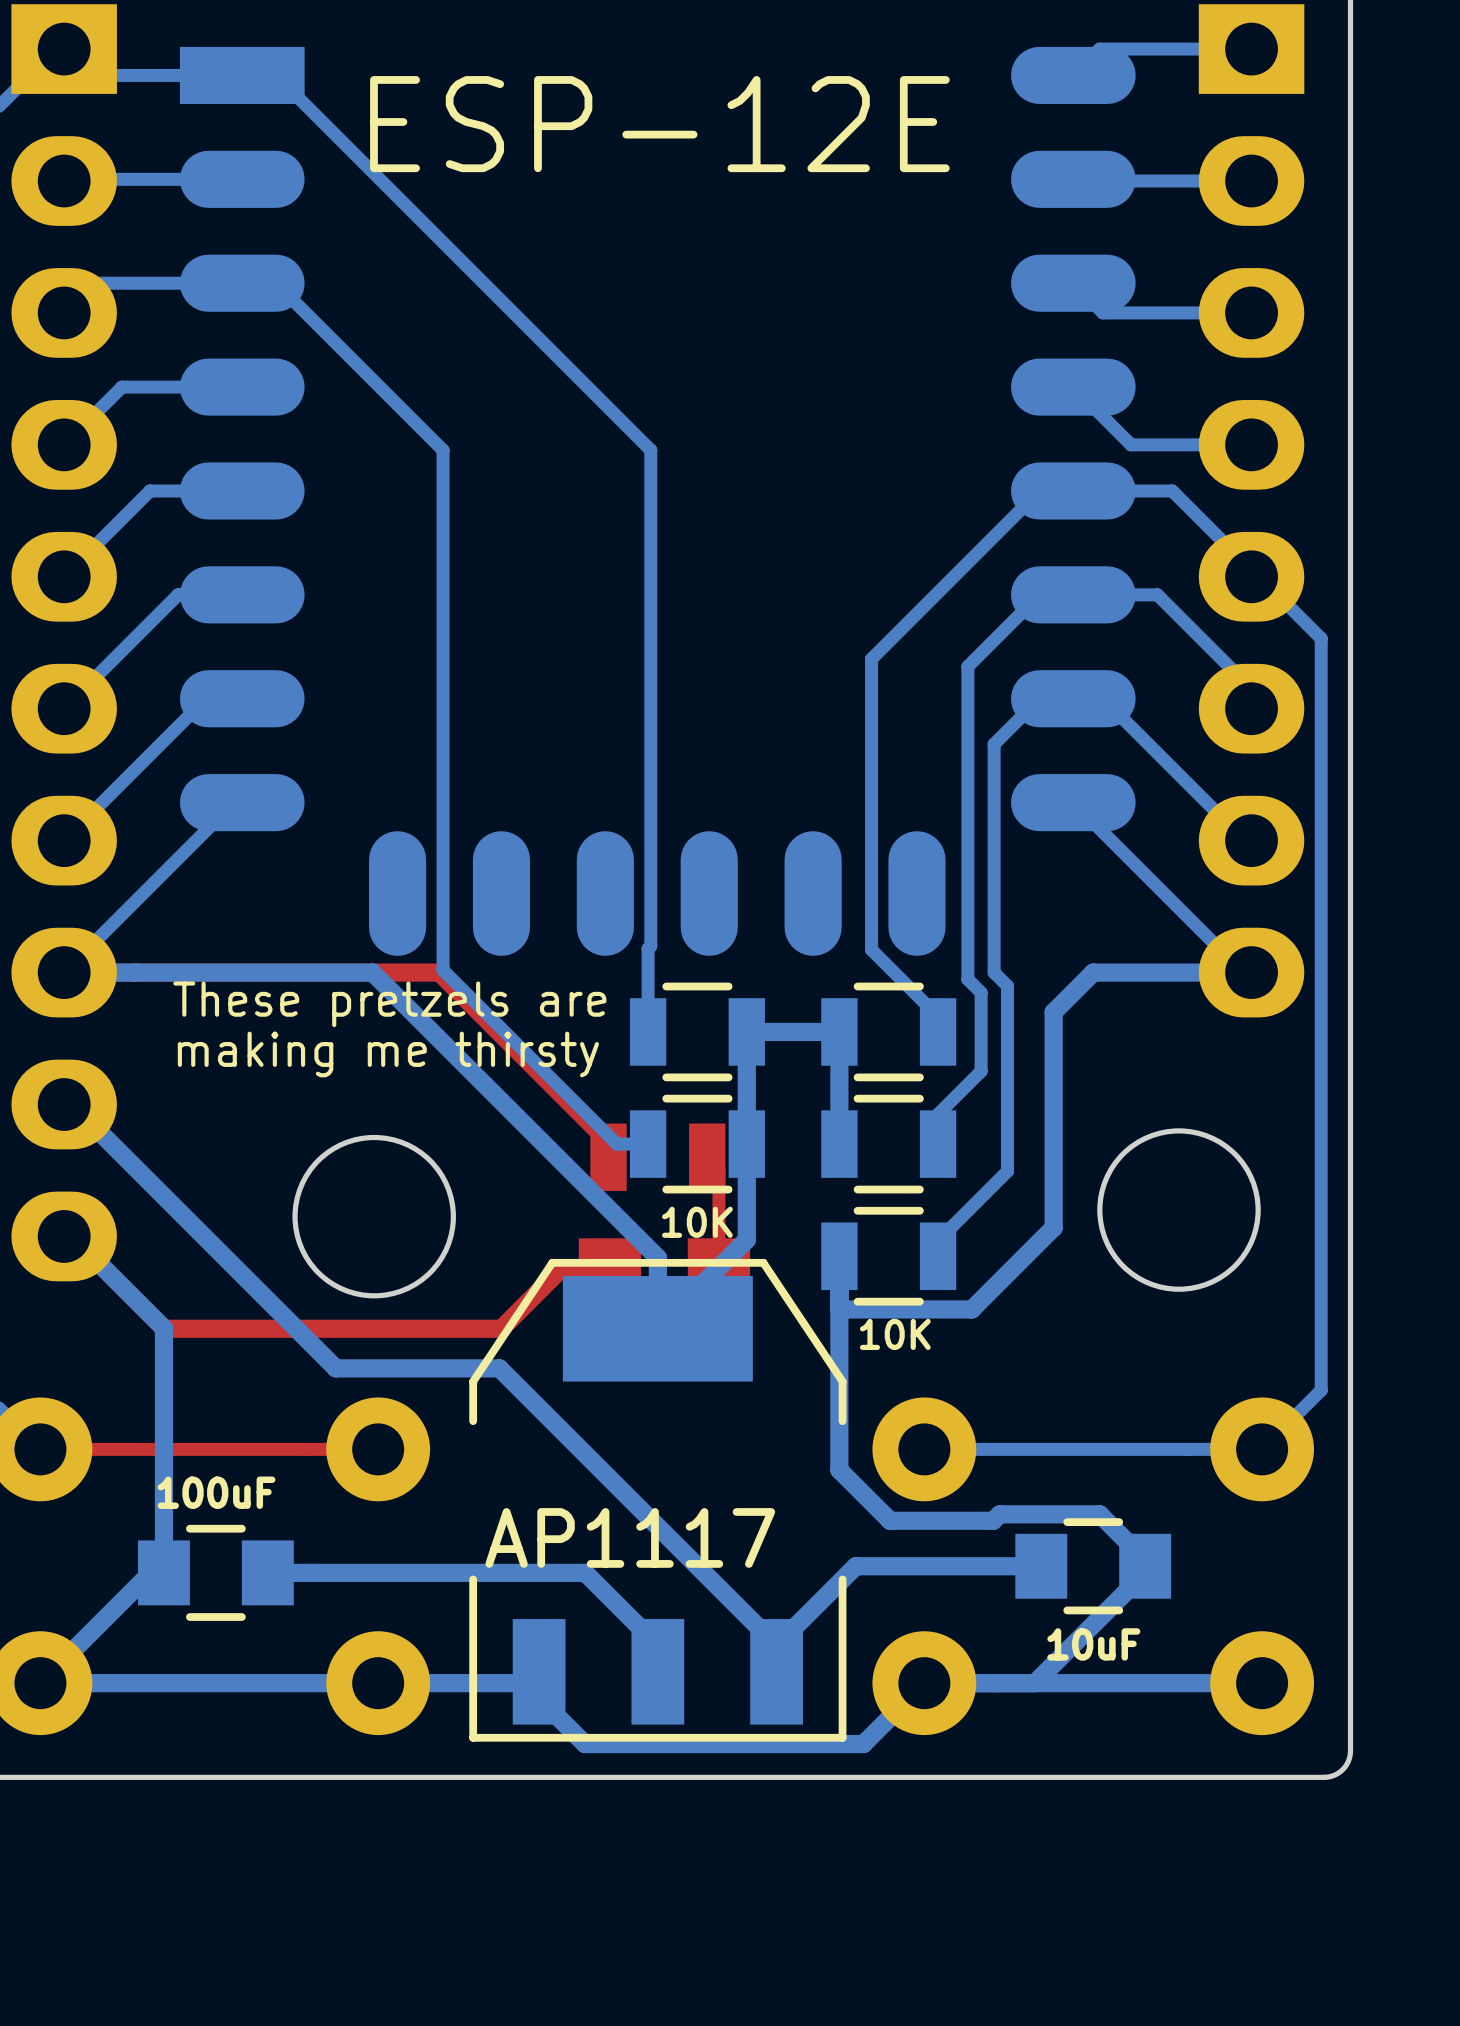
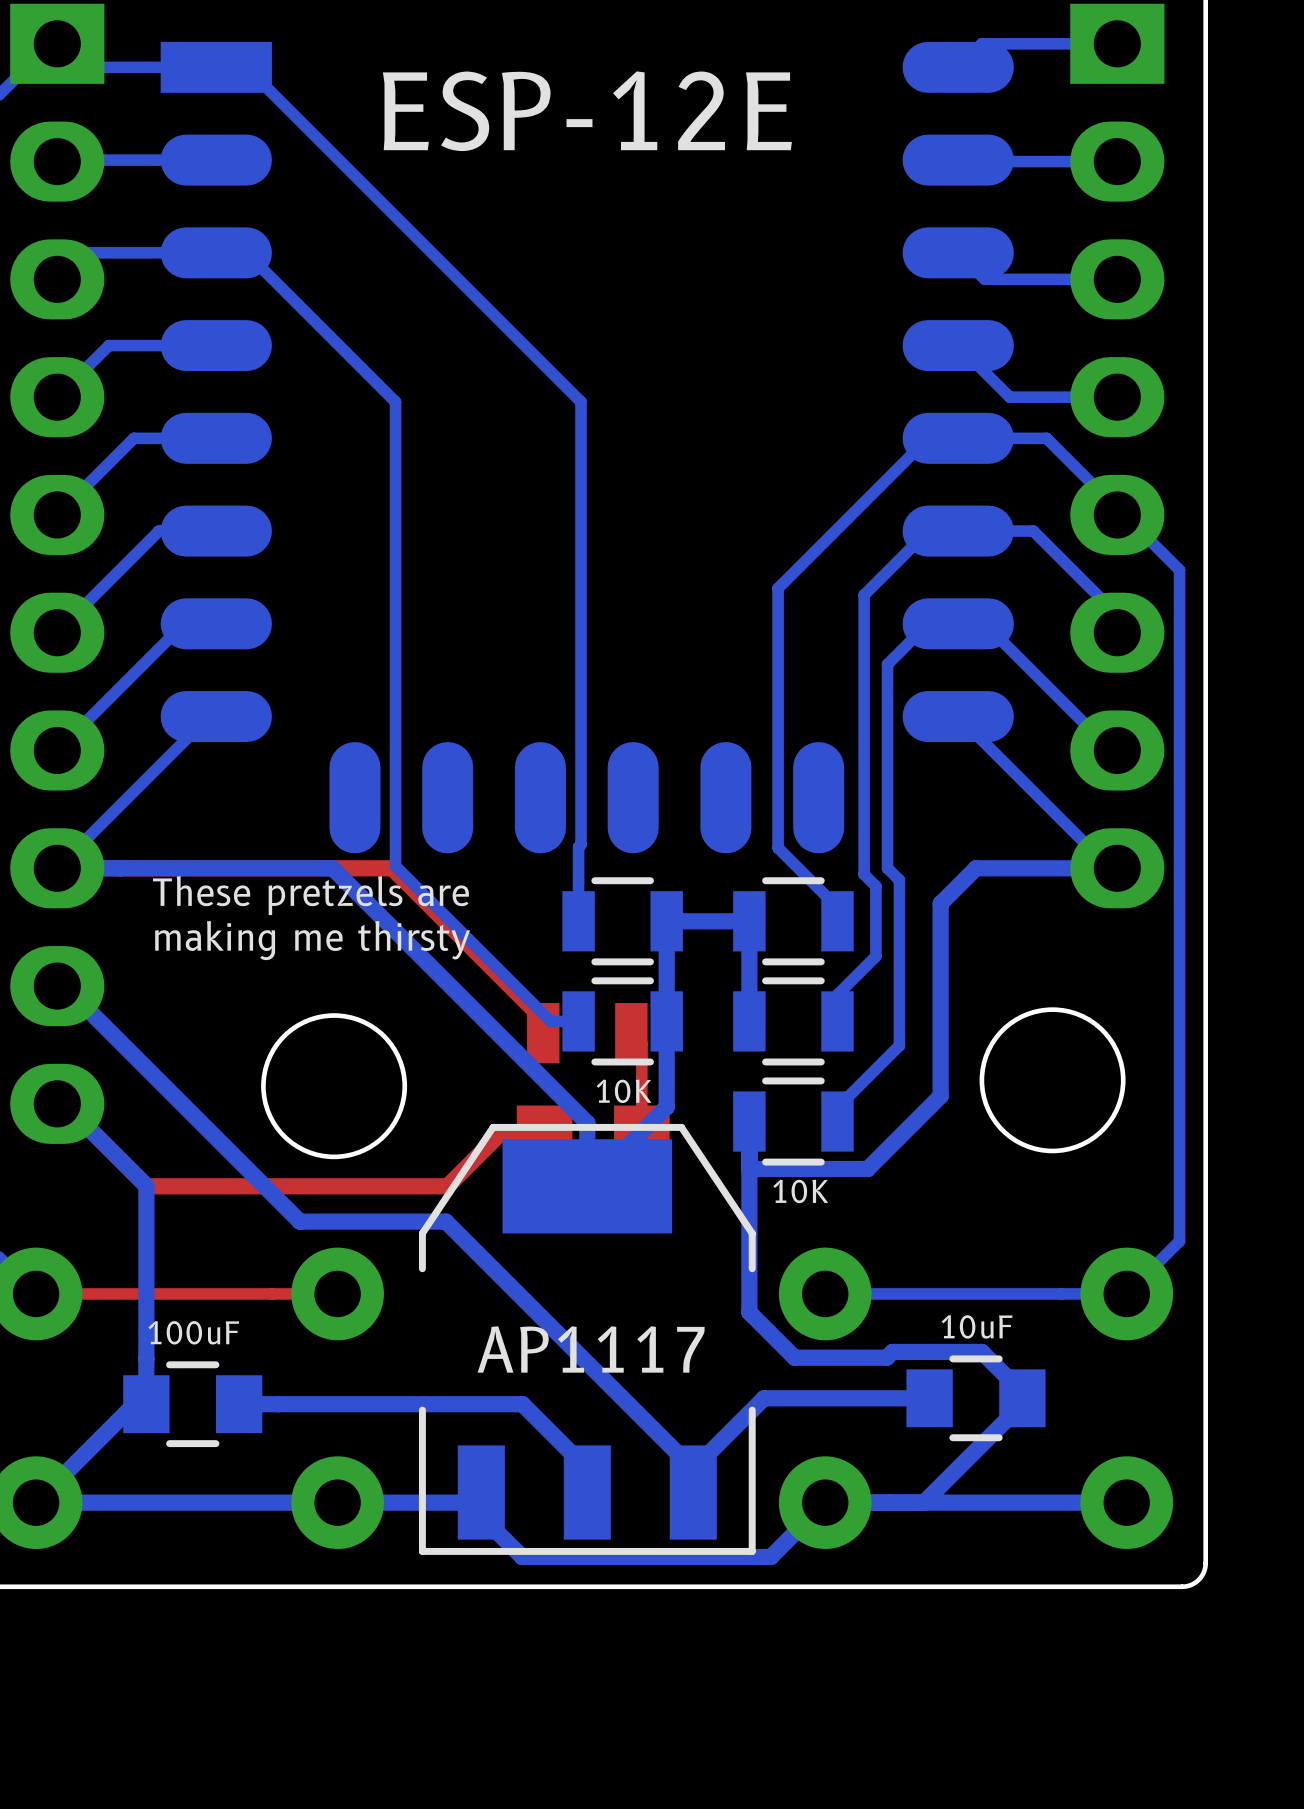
part value position: AP1117 (630, 1537) -> AP1117 (591, 1349)
part value position: 10uF (1093, 1644) -> 10uF (977, 1326)

